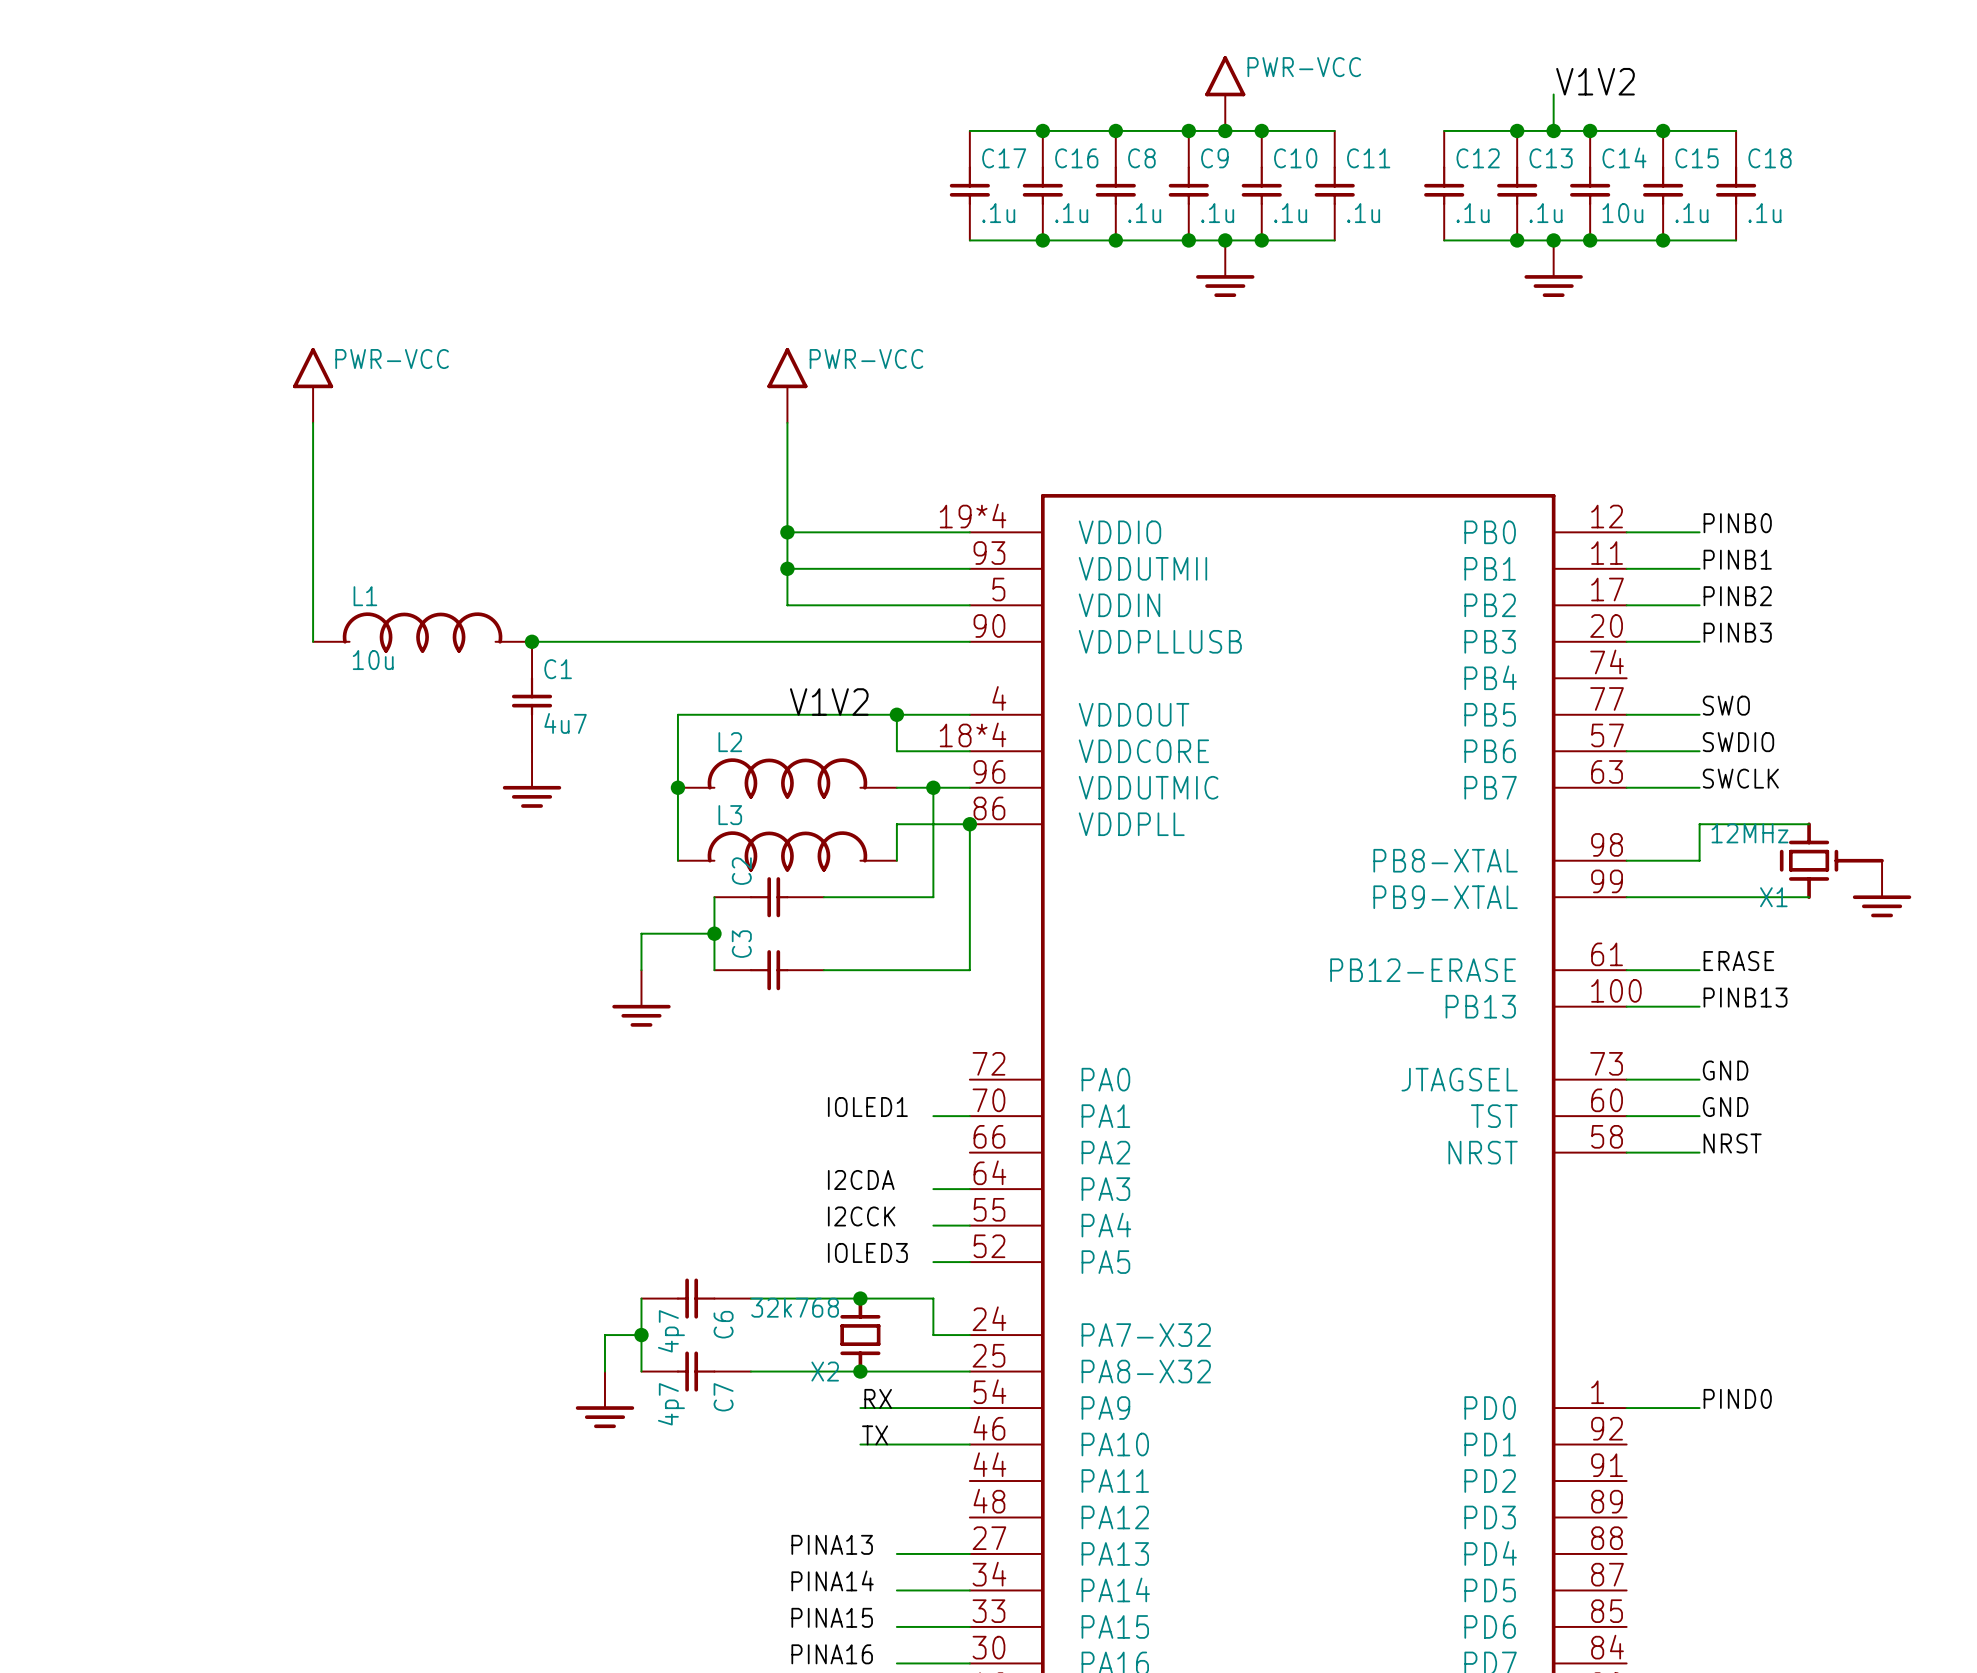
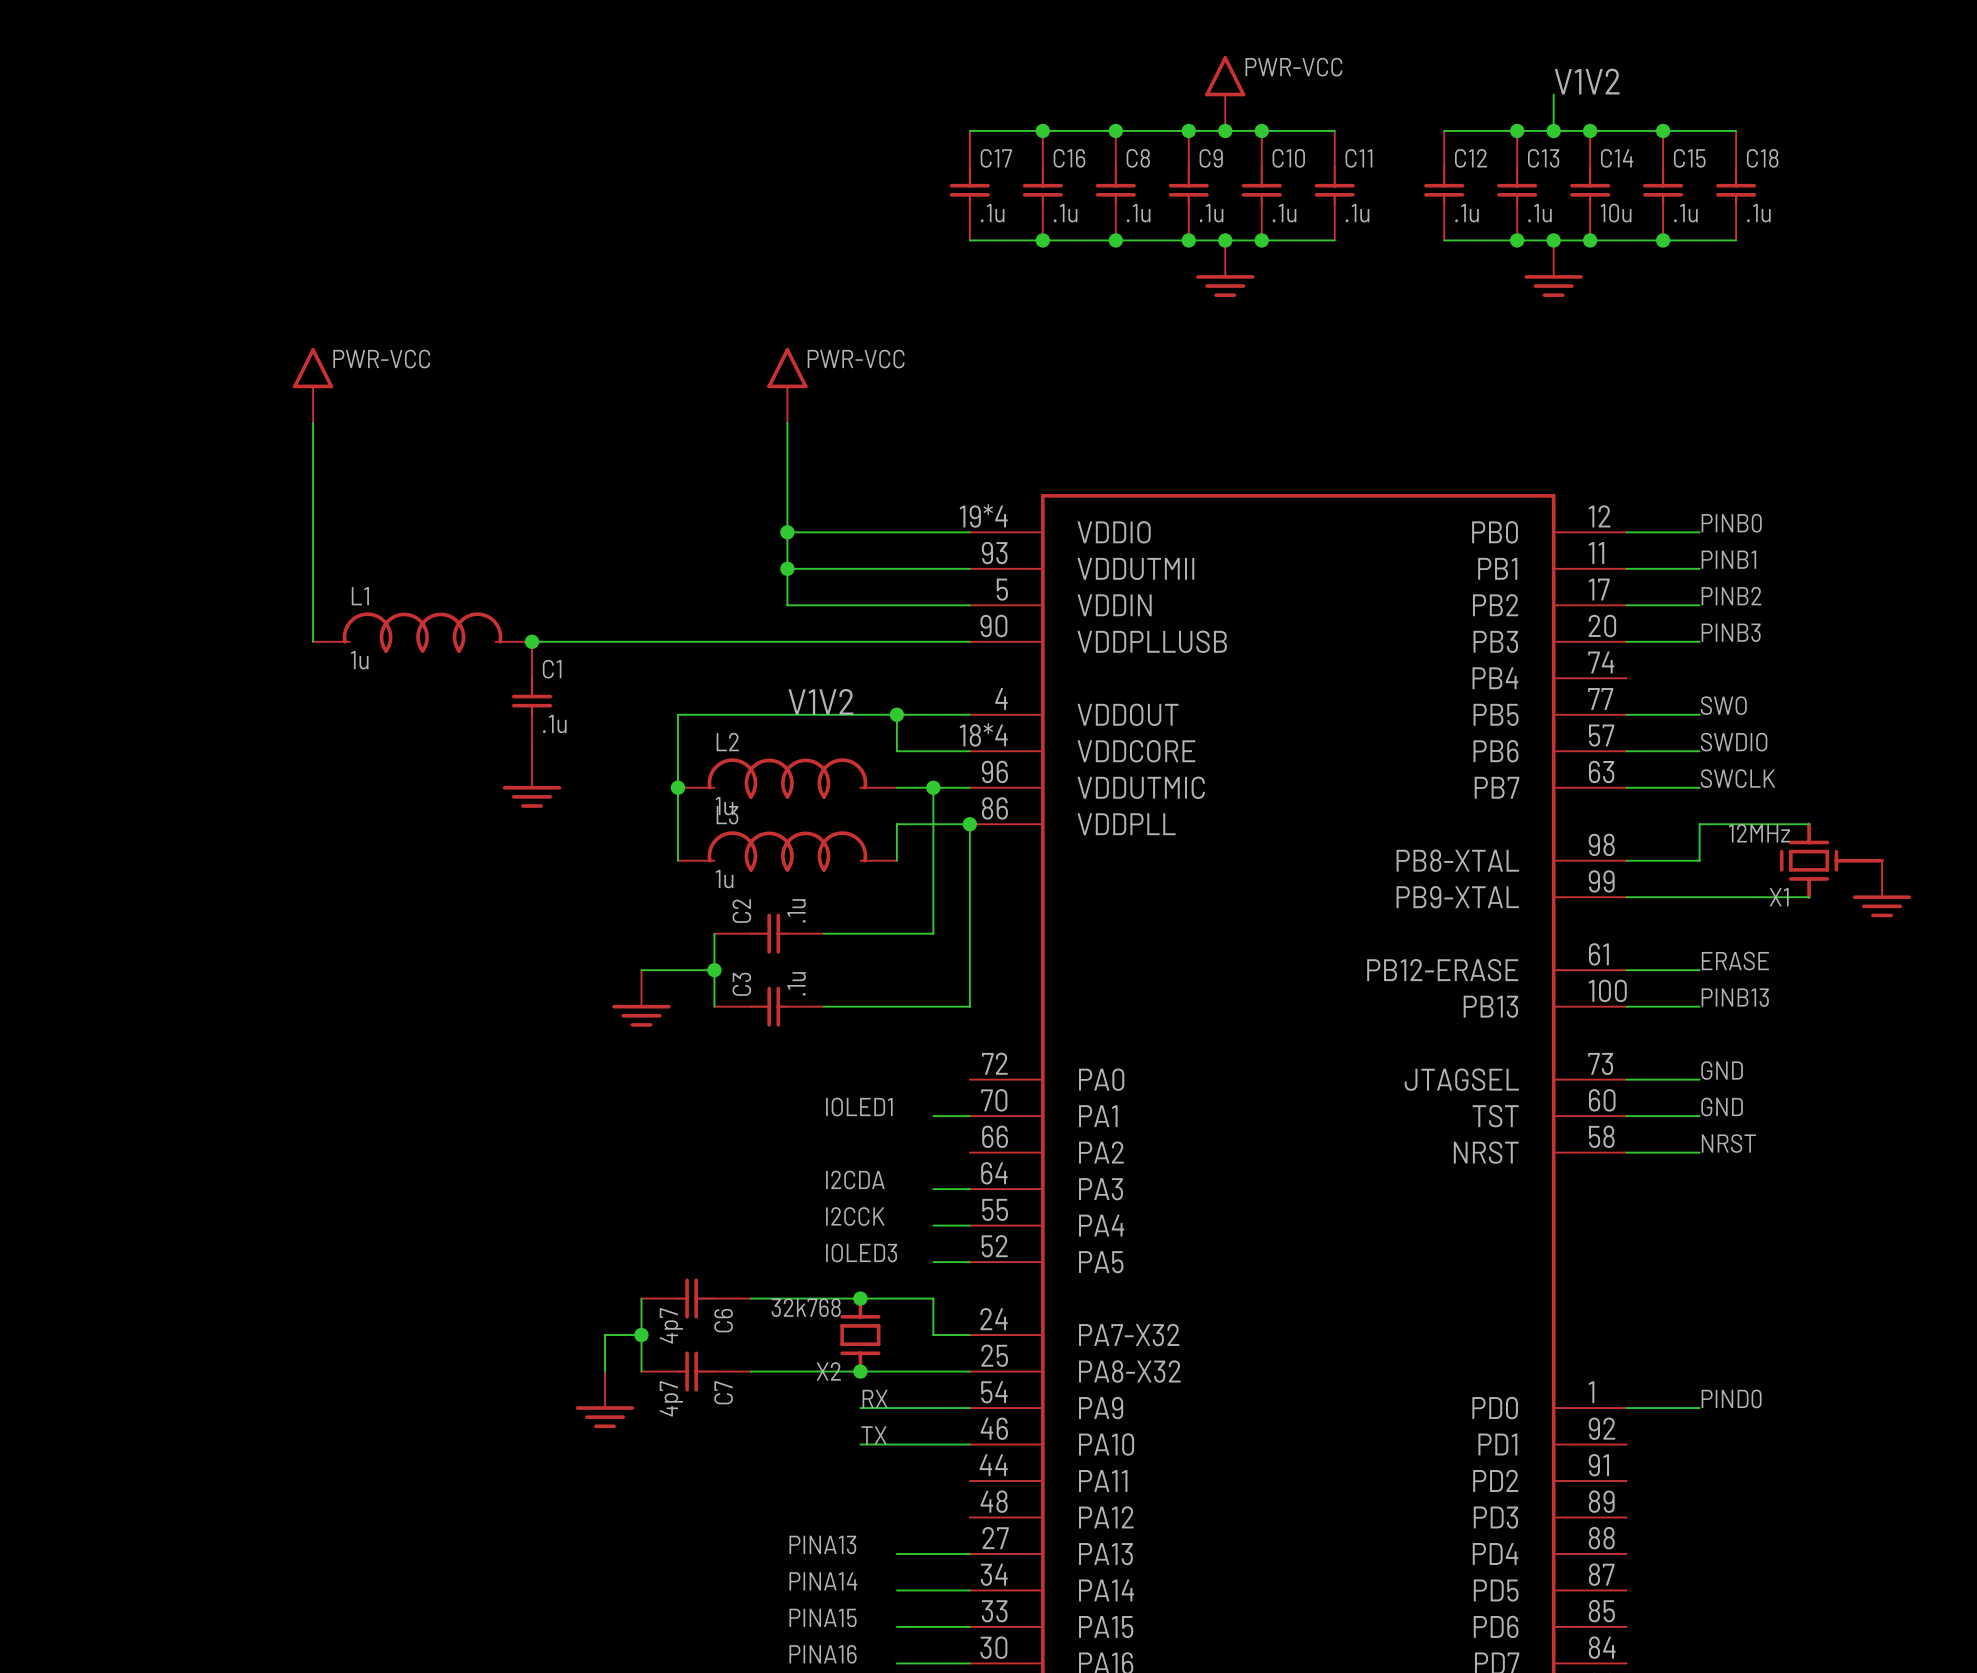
L1 value: 10u (373, 660) -> 1u (359, 660)
C1 value: 4u7 (565, 723) -> .1u (554, 723)
L2 value: none -> 1u (724, 806)
L3 value: none -> 1u (724, 879)
wire: (714, 897) (714, 933) (641, 933) (641, 970) -> (714, 1006) (714, 970) (641, 970)
C2 position: (769, 897) -> (769, 933)
wire: (823, 897) (933, 897) -> (823, 933) (933, 933) (933, 897)
C2 value: none -> .1u (796, 910)
junction position: (714, 933) -> (714, 970)
C3 position: (769, 970) -> (769, 1006)
wire: (823, 970) (969, 970) -> (823, 1006) (969, 1006) (969, 970)
C3 value: none -> .1u (796, 983)

